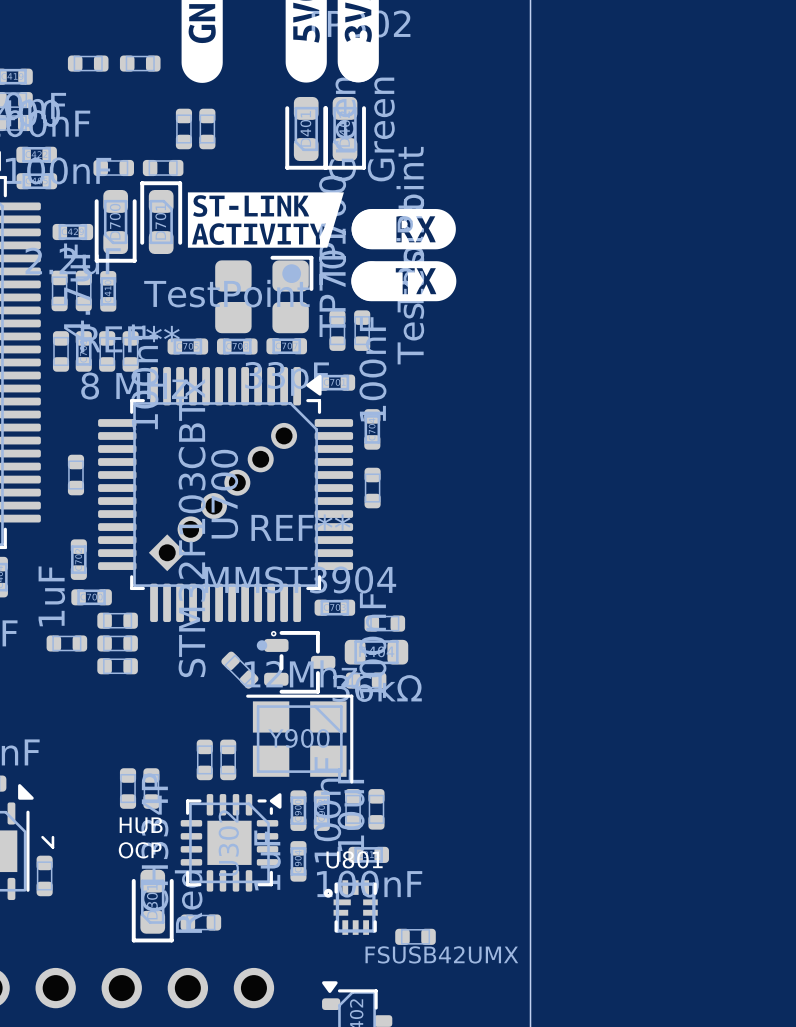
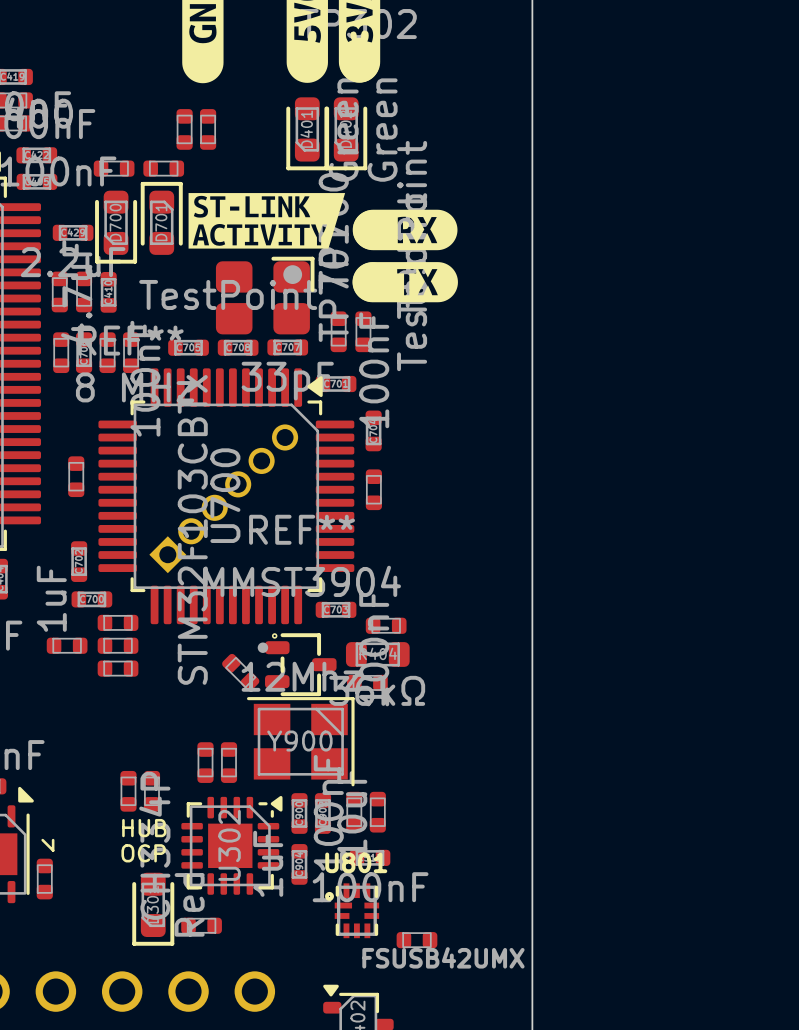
part: (88, 63) -> none
part: (140, 63) -> none

